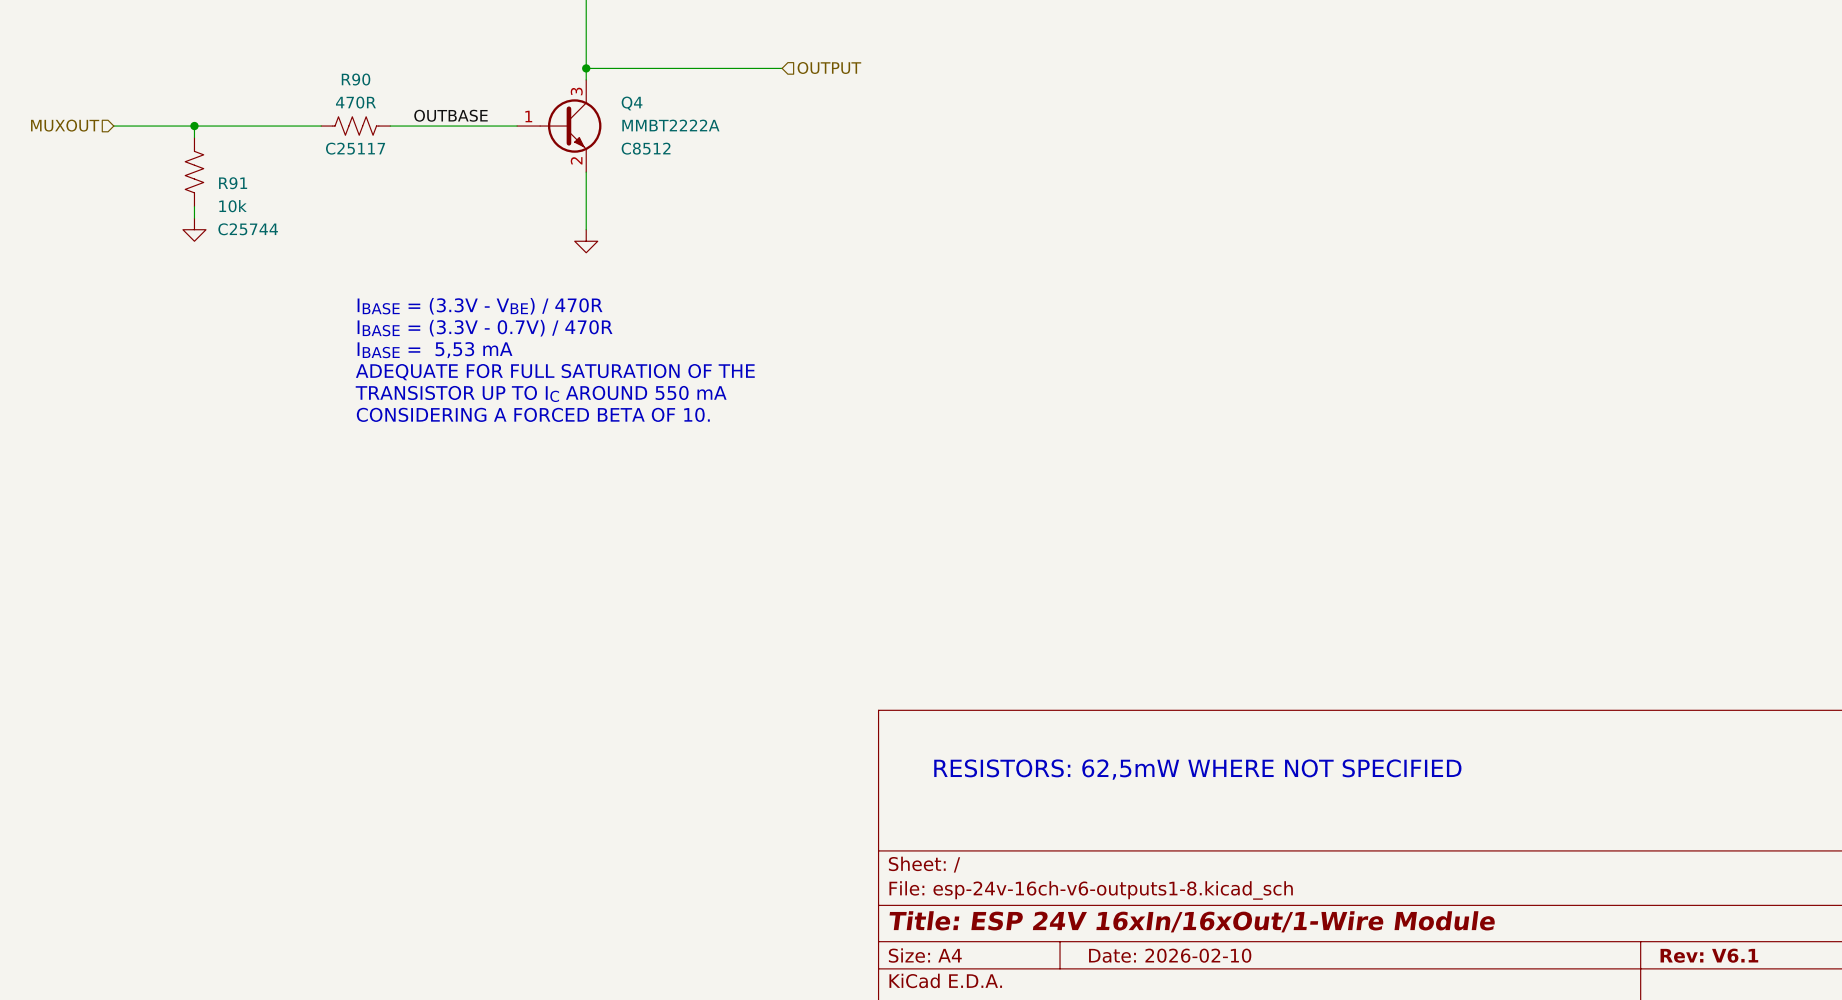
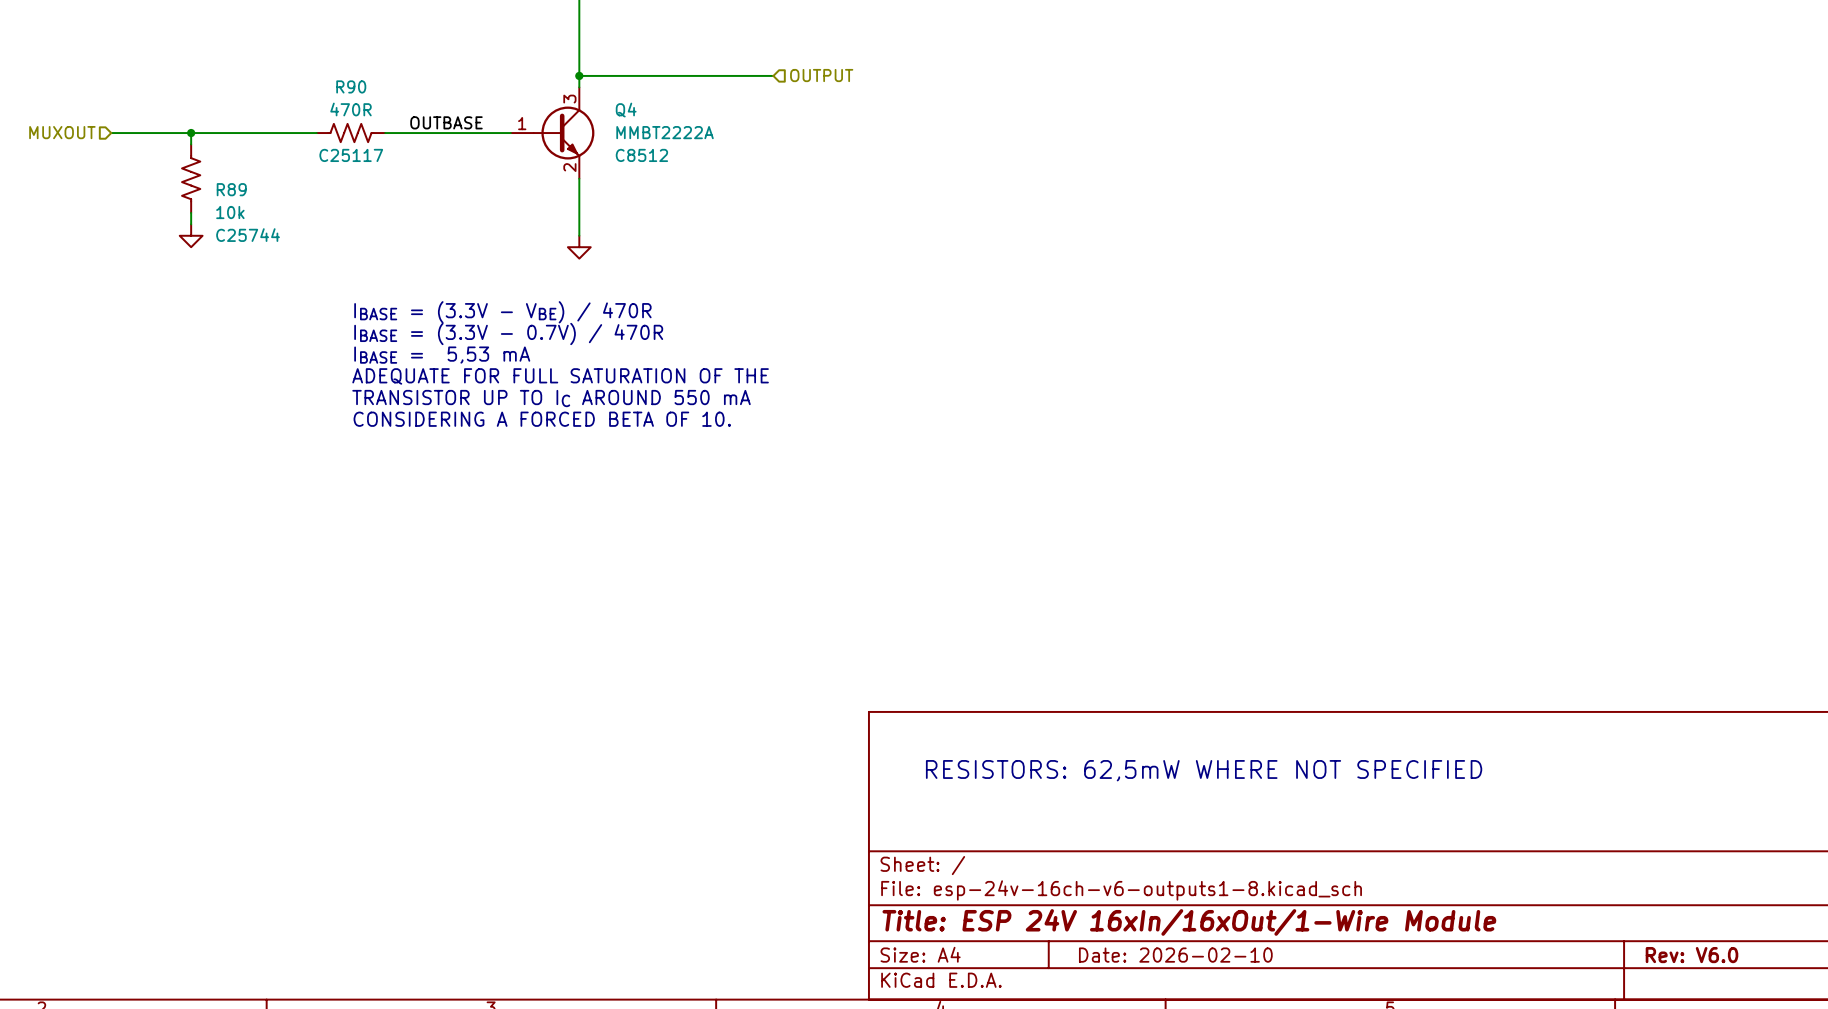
R91 name: R91 (233, 183) -> R89 (231, 189)
title block: Rev: V6.1 (1709, 955) -> Rev: V6.0 (1691, 955)

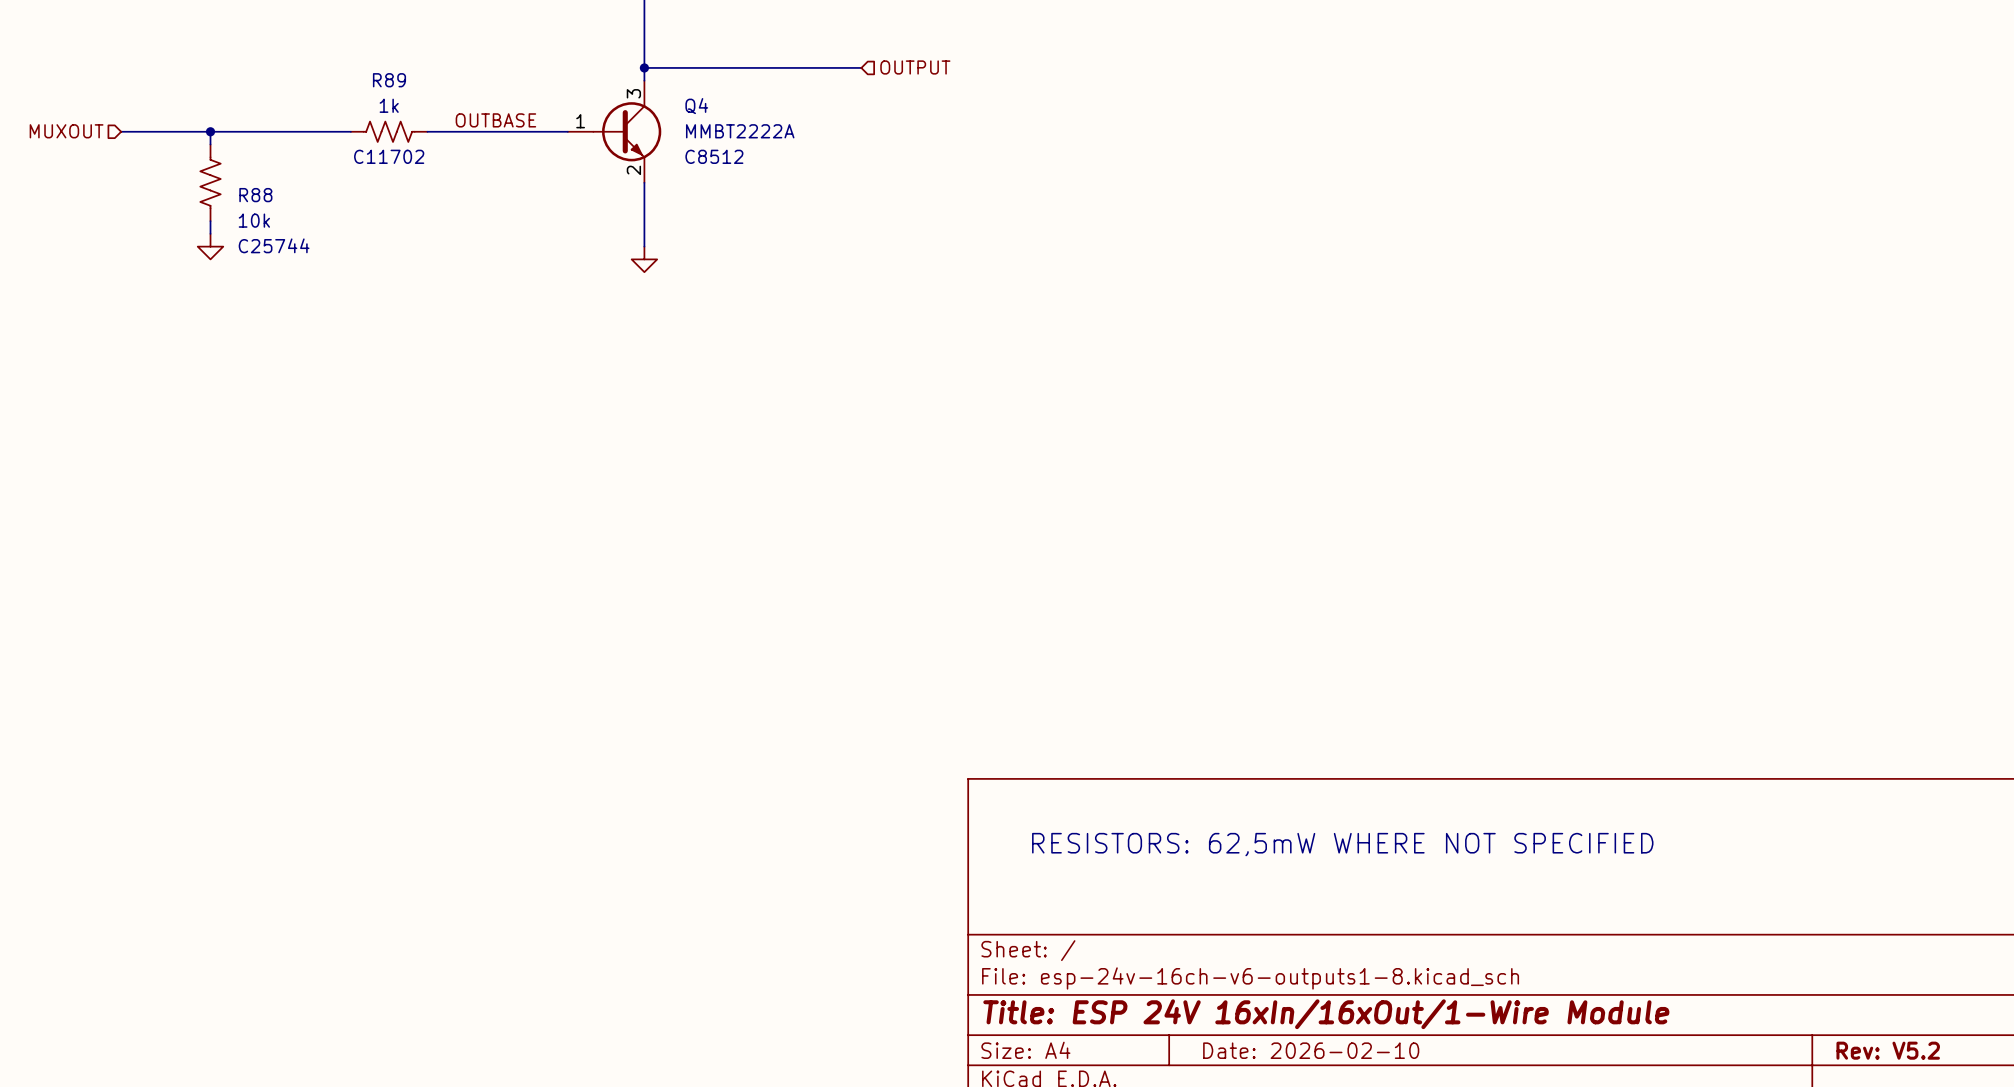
R90 name: R90 (351, 86) -> R89 (389, 80)
R90 value: 470R (350, 109) -> 1k (389, 105)
R90 text: C25117 (351, 155) -> C11702 (389, 156)
R89 name: R89 (231, 189) -> R88 (255, 195)
text: IBASE = (3.3V - VBE) / 470R (502, 312) -> none
text: IBASE = (3.3V - 0.7V) / 470R (508, 333) -> none
text: IBASE = 5,53 mA (442, 355) -> none
text: ADEQUATE FOR FULL SATURATION OF THE (560, 376) -> none
text: TRANSISTOR UP TO IC AROUND 550 mA (551, 398) -> none
text: CONSIDERING A FORCED BETA OF 10. (542, 419) -> none
title block: Rev: V6.0 (1691, 955) -> Rev: V5.2 (1888, 1050)

